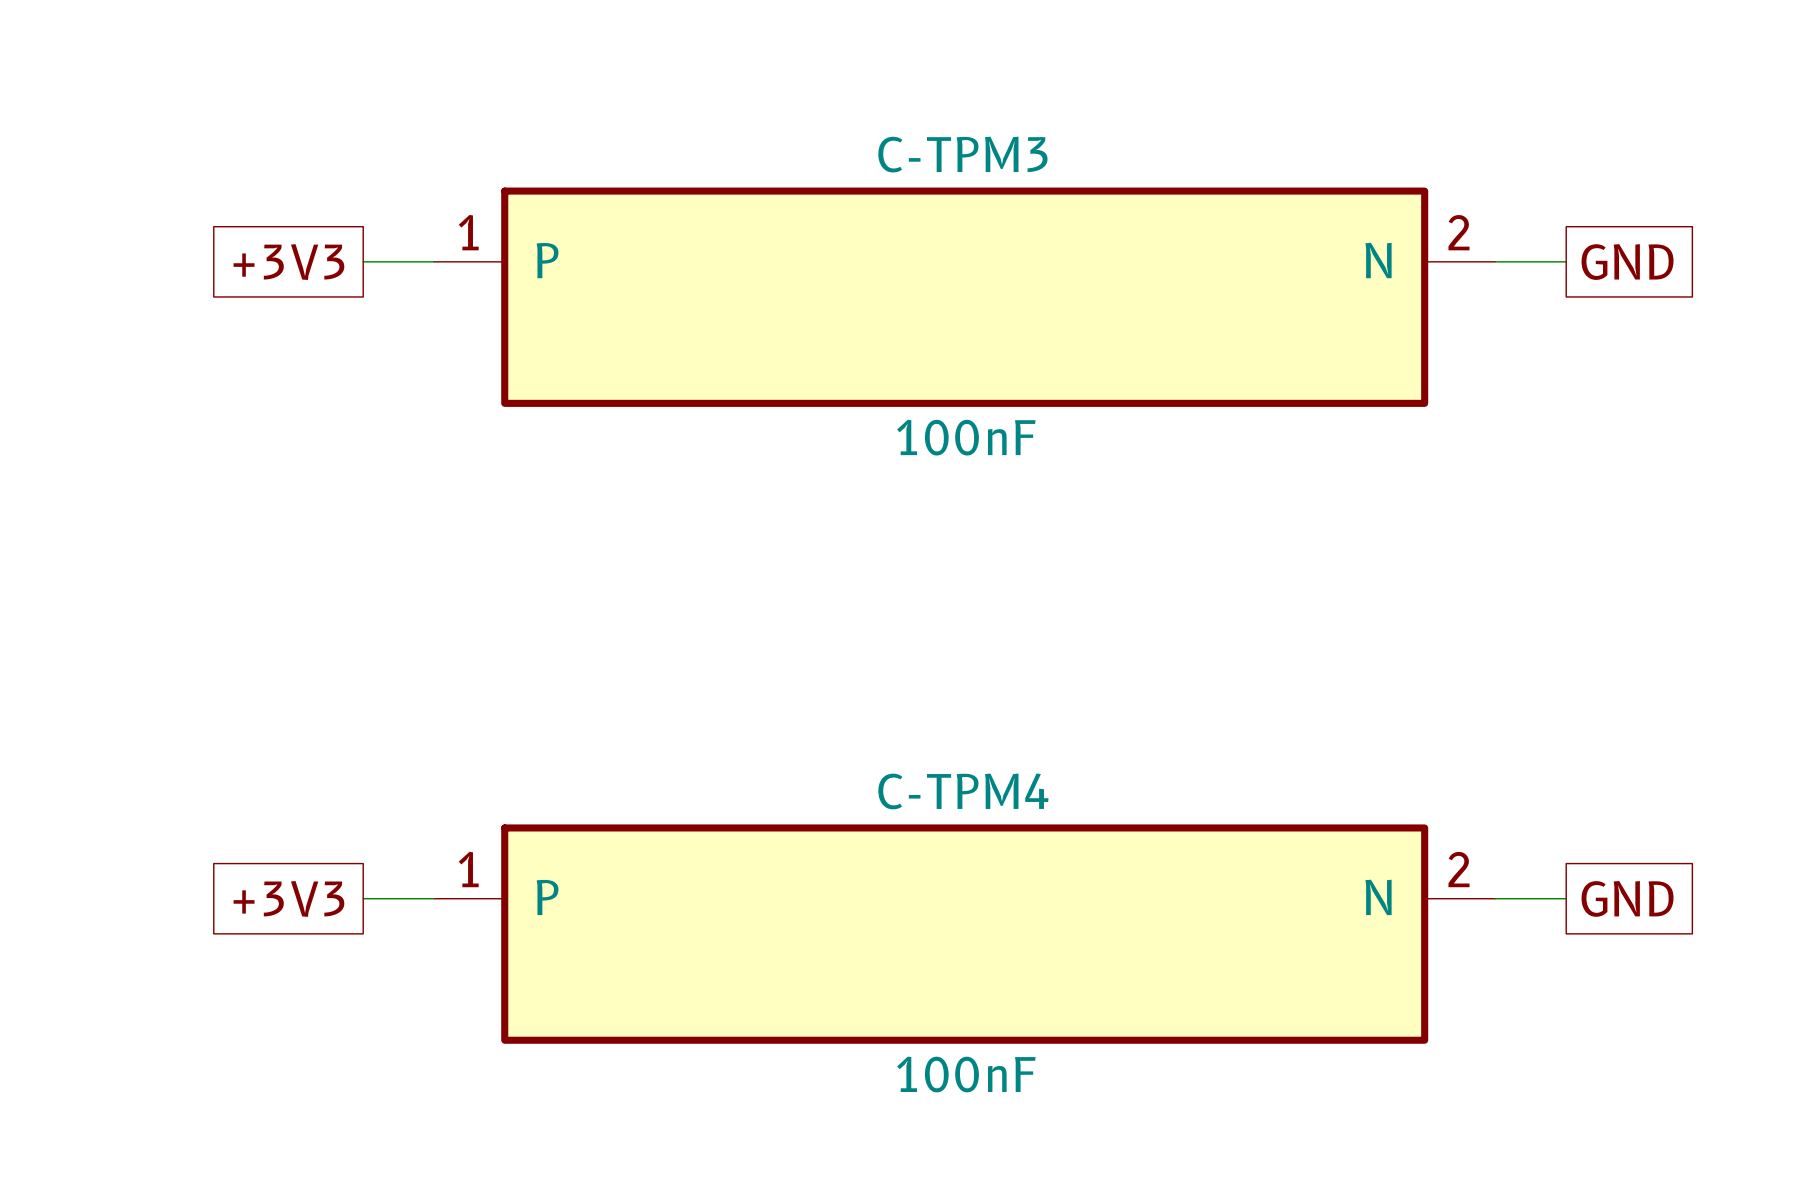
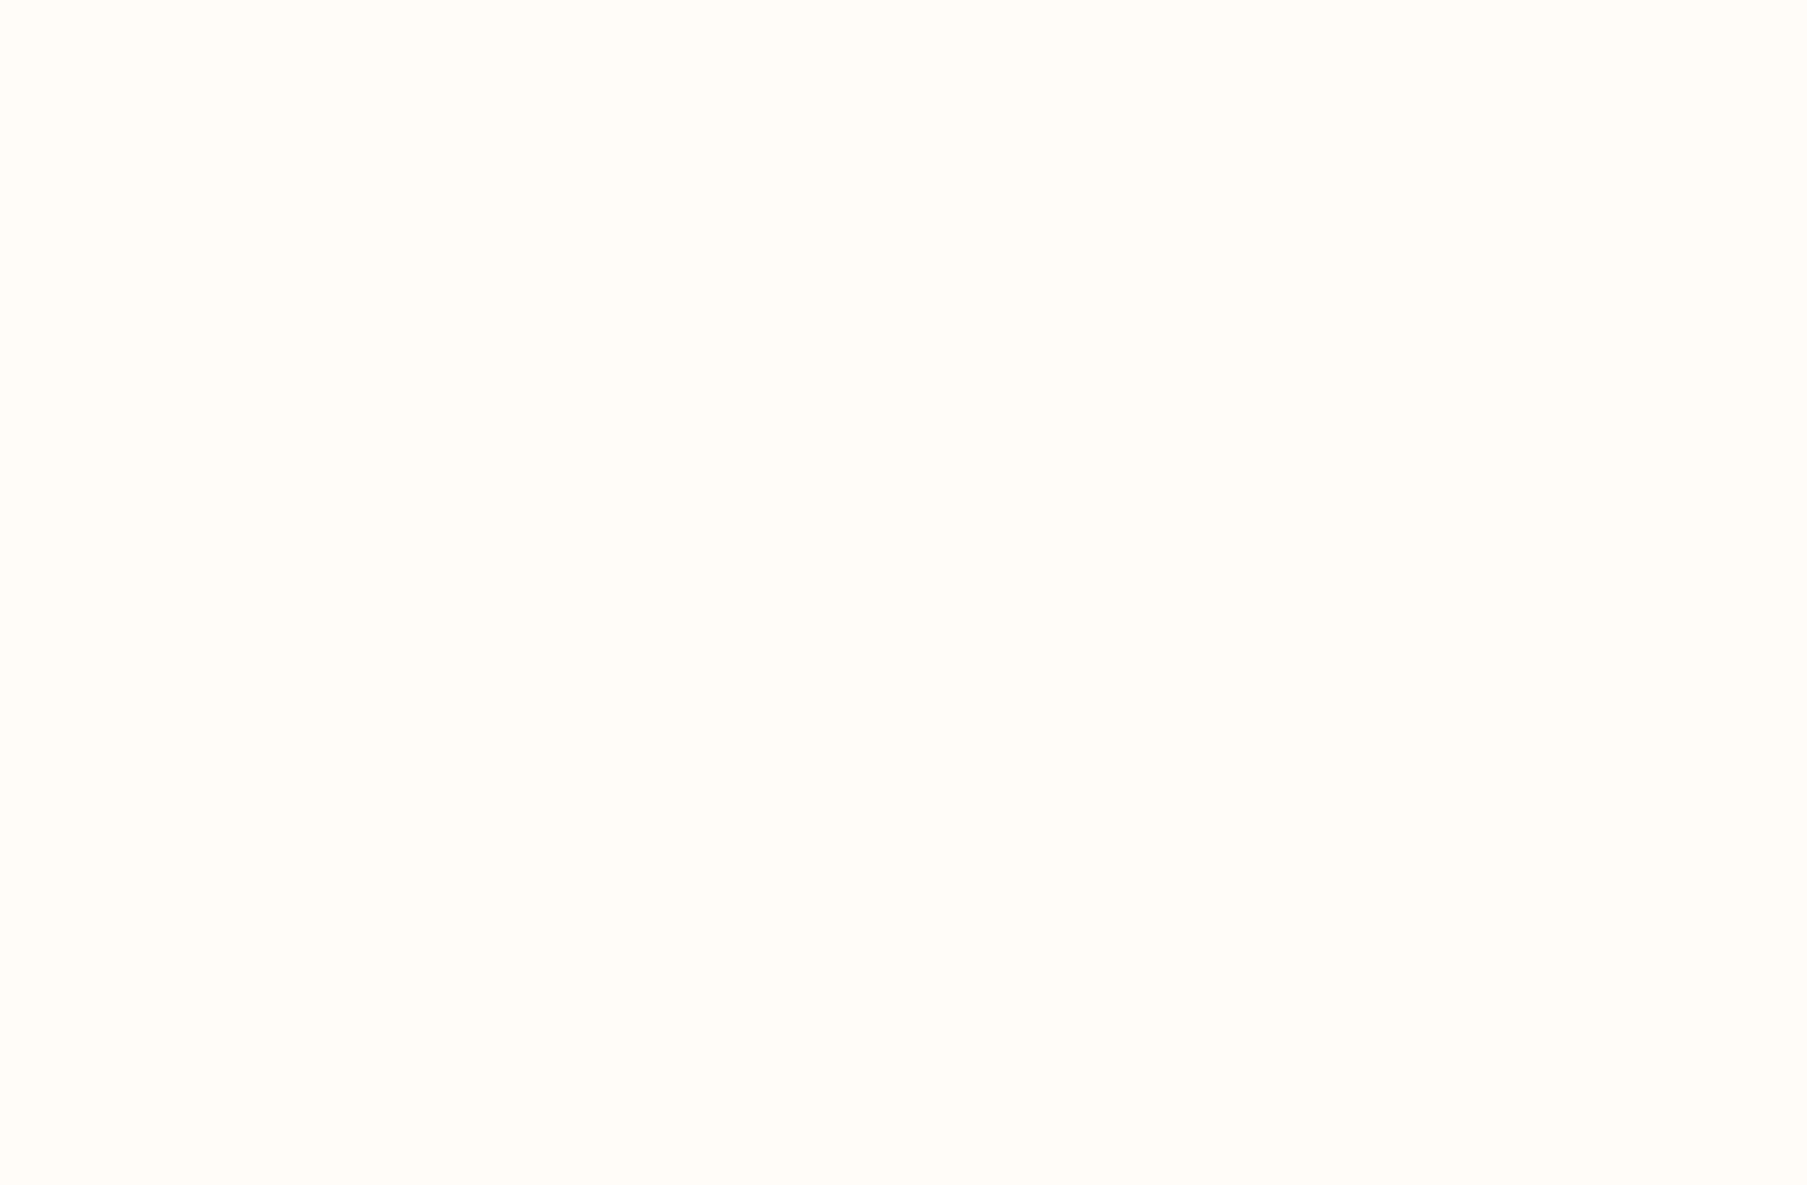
wire: (363, 261) (433, 261) -> none
wire: (1495, 261) (1566, 261) -> none
global label: +3V3 (288, 262) -> none
global label: GND (1627, 262) -> none
C-TPM3: 100nF (964, 297) -> none
global label: +3V3 (288, 898) -> none
wire: (363, 898) (433, 898) -> none
wire: (1495, 898) (1566, 898) -> none
global label: GND (1627, 898) -> none
C-TPM4: 100nF (964, 934) -> none

